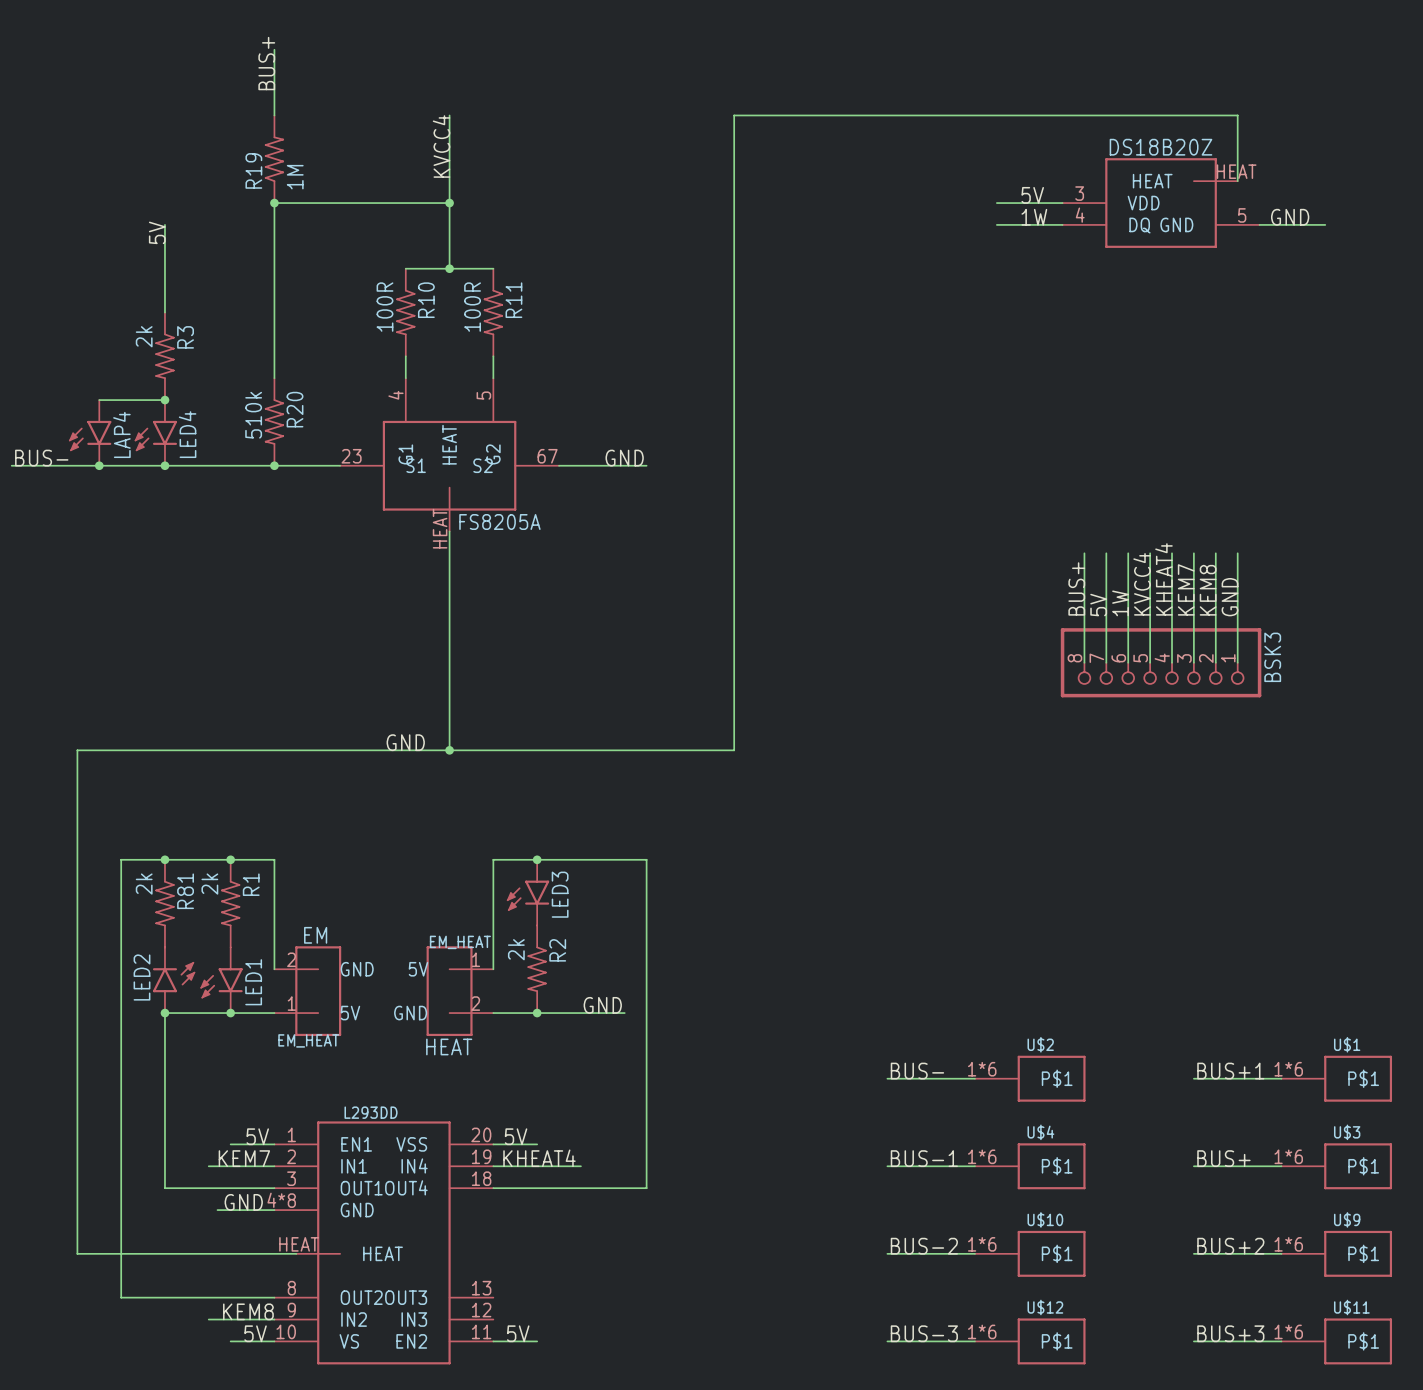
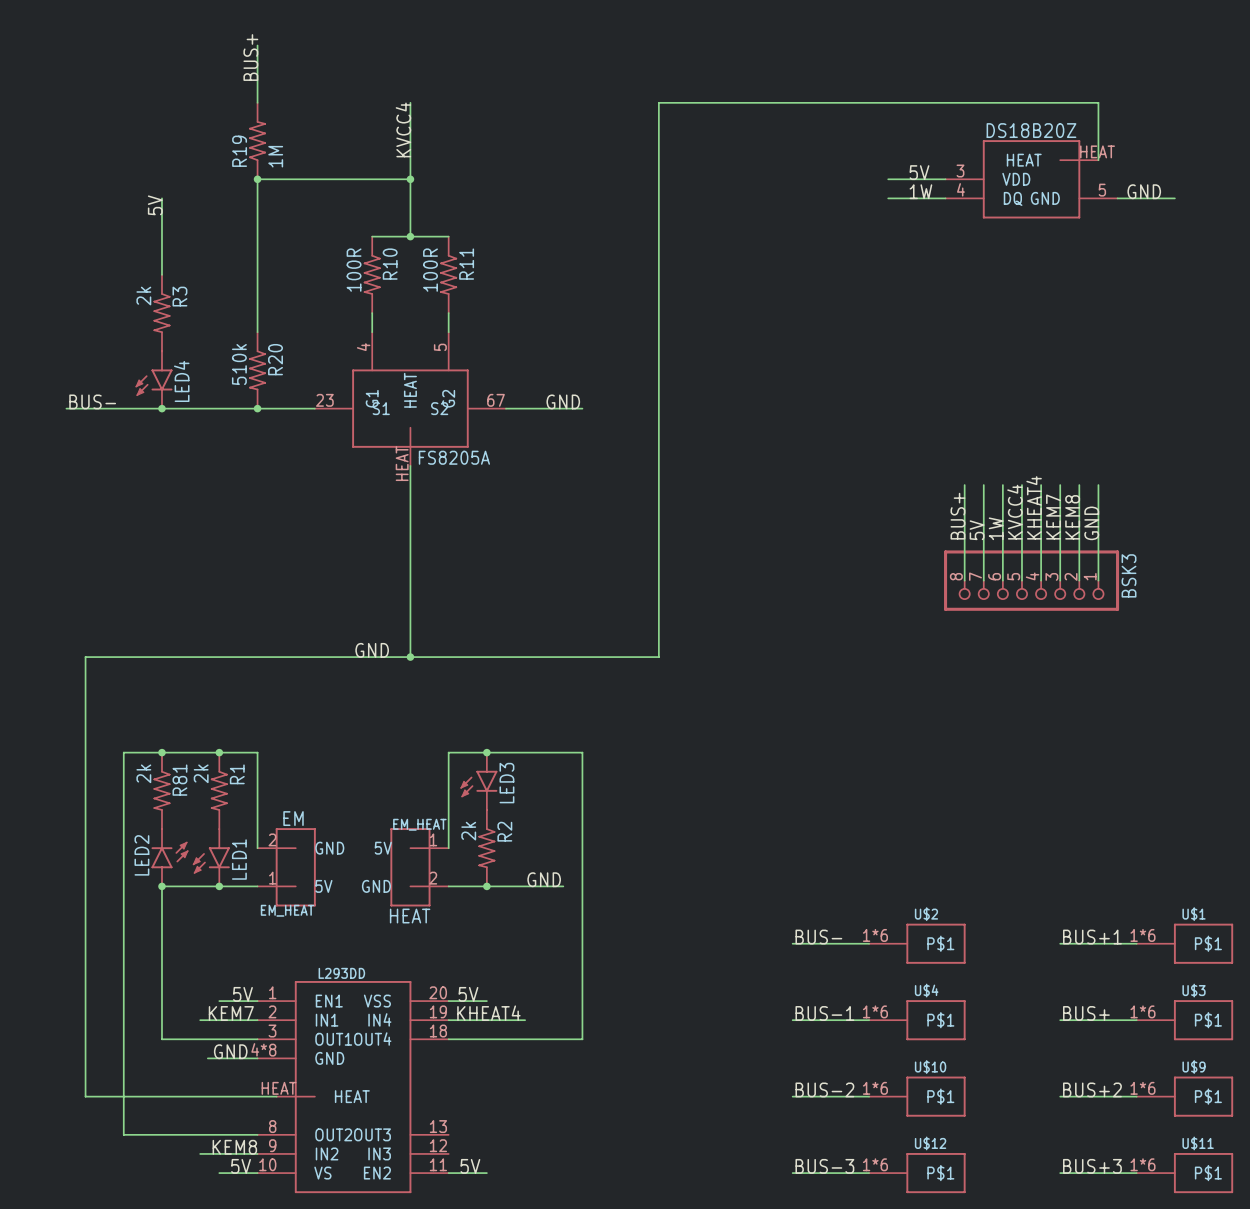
wire: (99, 400) (164, 400) -> none
junction: (164, 400) -> none
LAP4: (90, 432) -> none
label position: BUS- (41, 458) -> BUS- (92, 401)
wire: (11, 465) (55, 465) -> none
junction: (99, 465) -> none

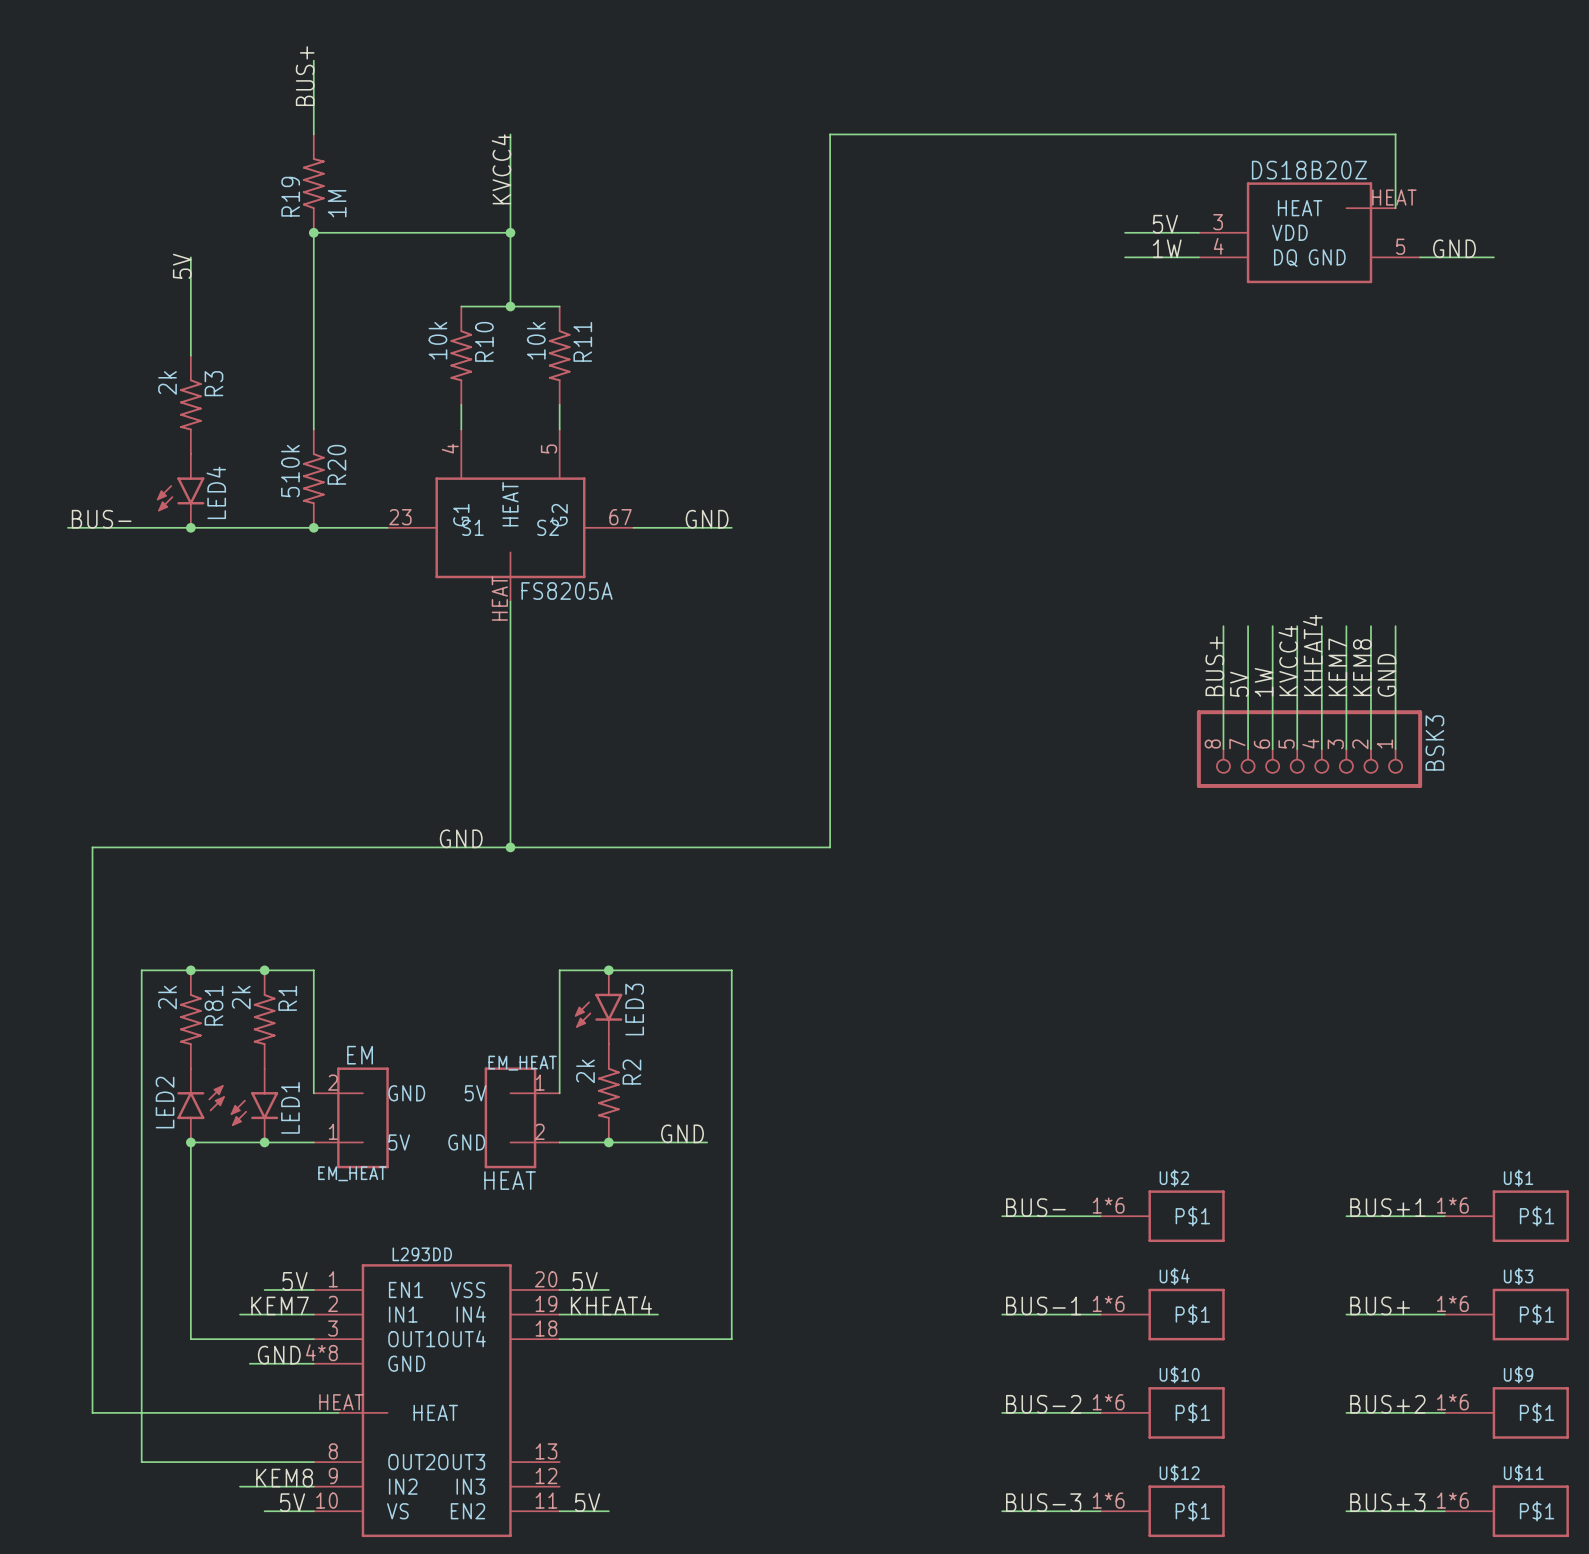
R10 value: 100R (354, 270) -> 10k (437, 340)
R11 value: 100R (430, 270) -> 10k (536, 340)

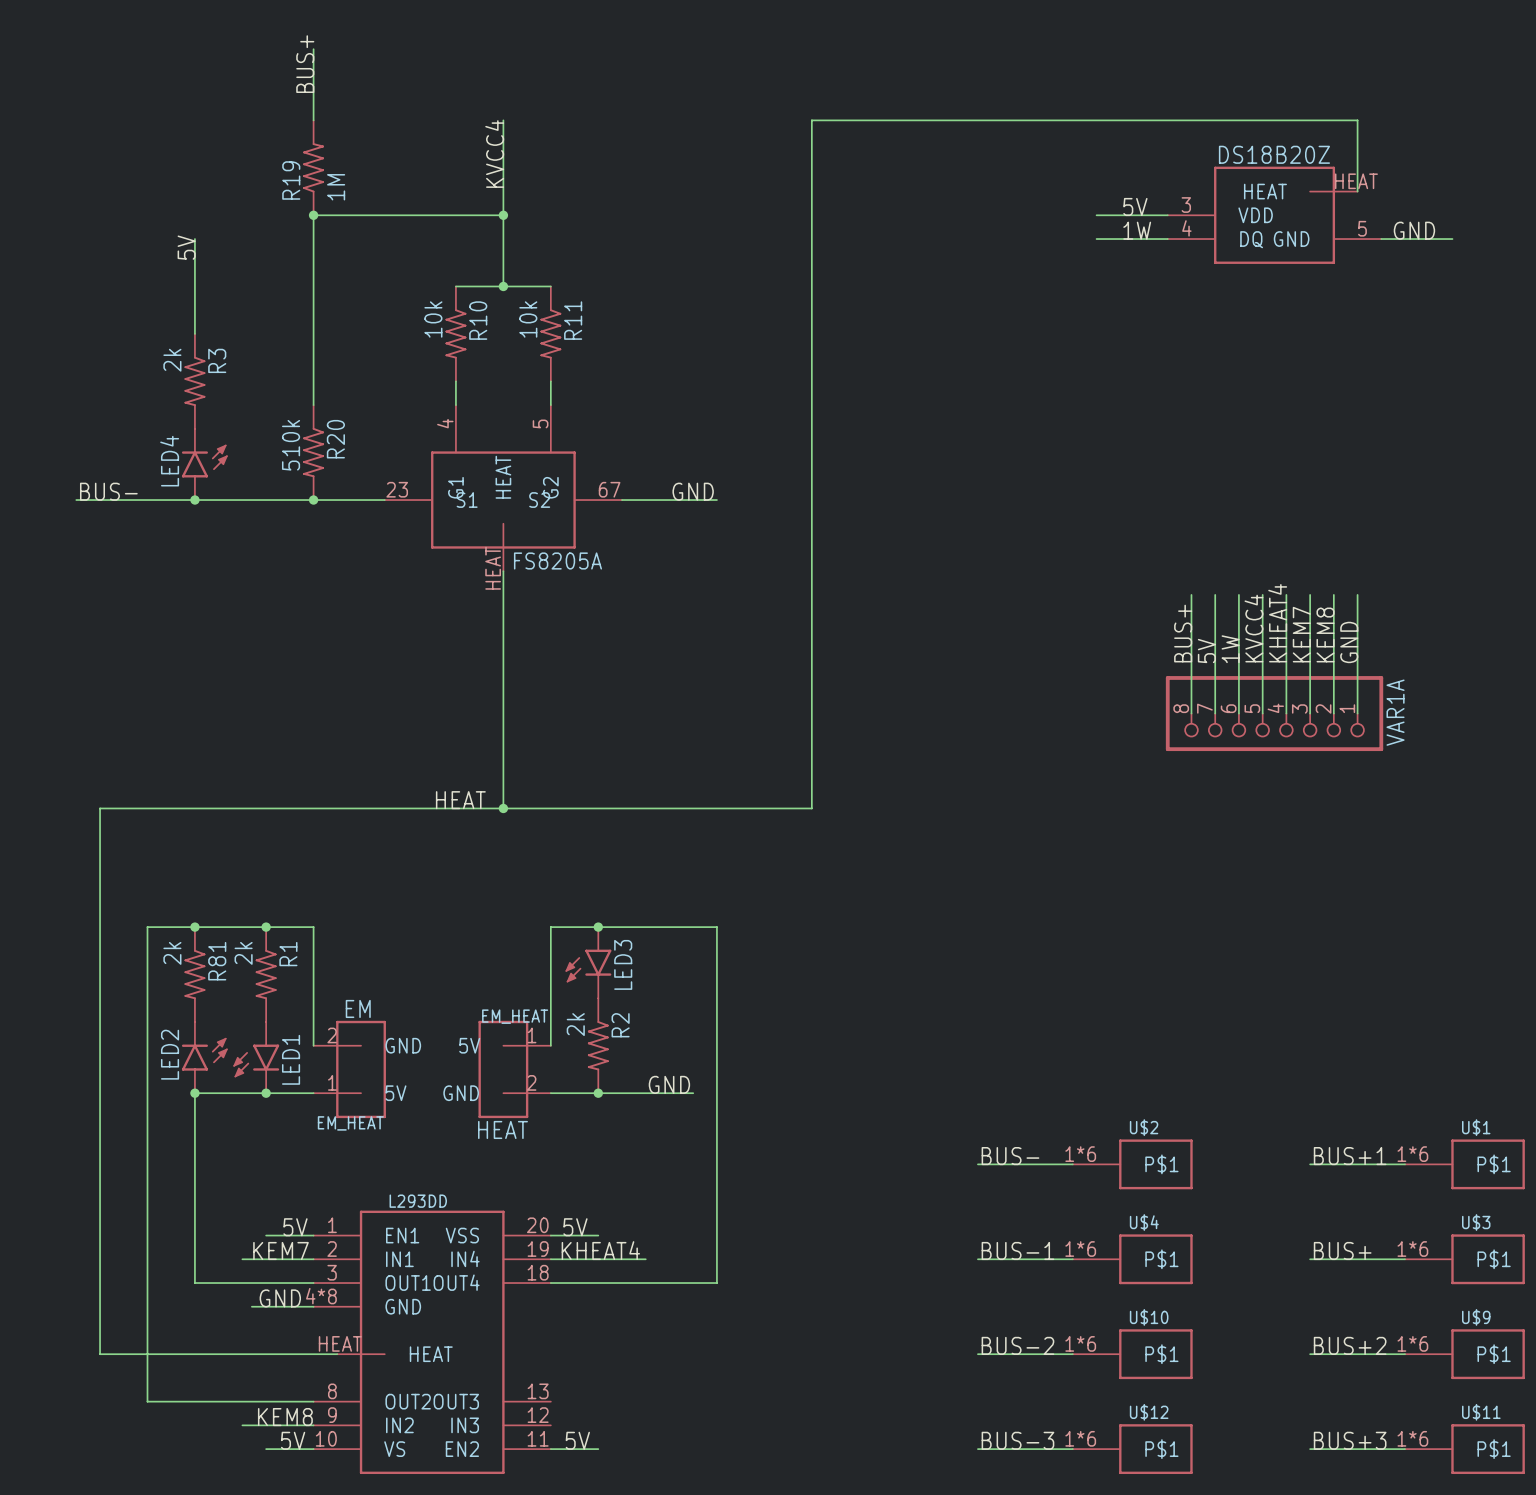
LED4 rotation: 0° (180, 494) -> 180° (204, 461)
BSK3 name: BSK3 (1434, 742) -> VAR1A (1395, 712)
label: GND (461, 838) -> HEAT (460, 800)

